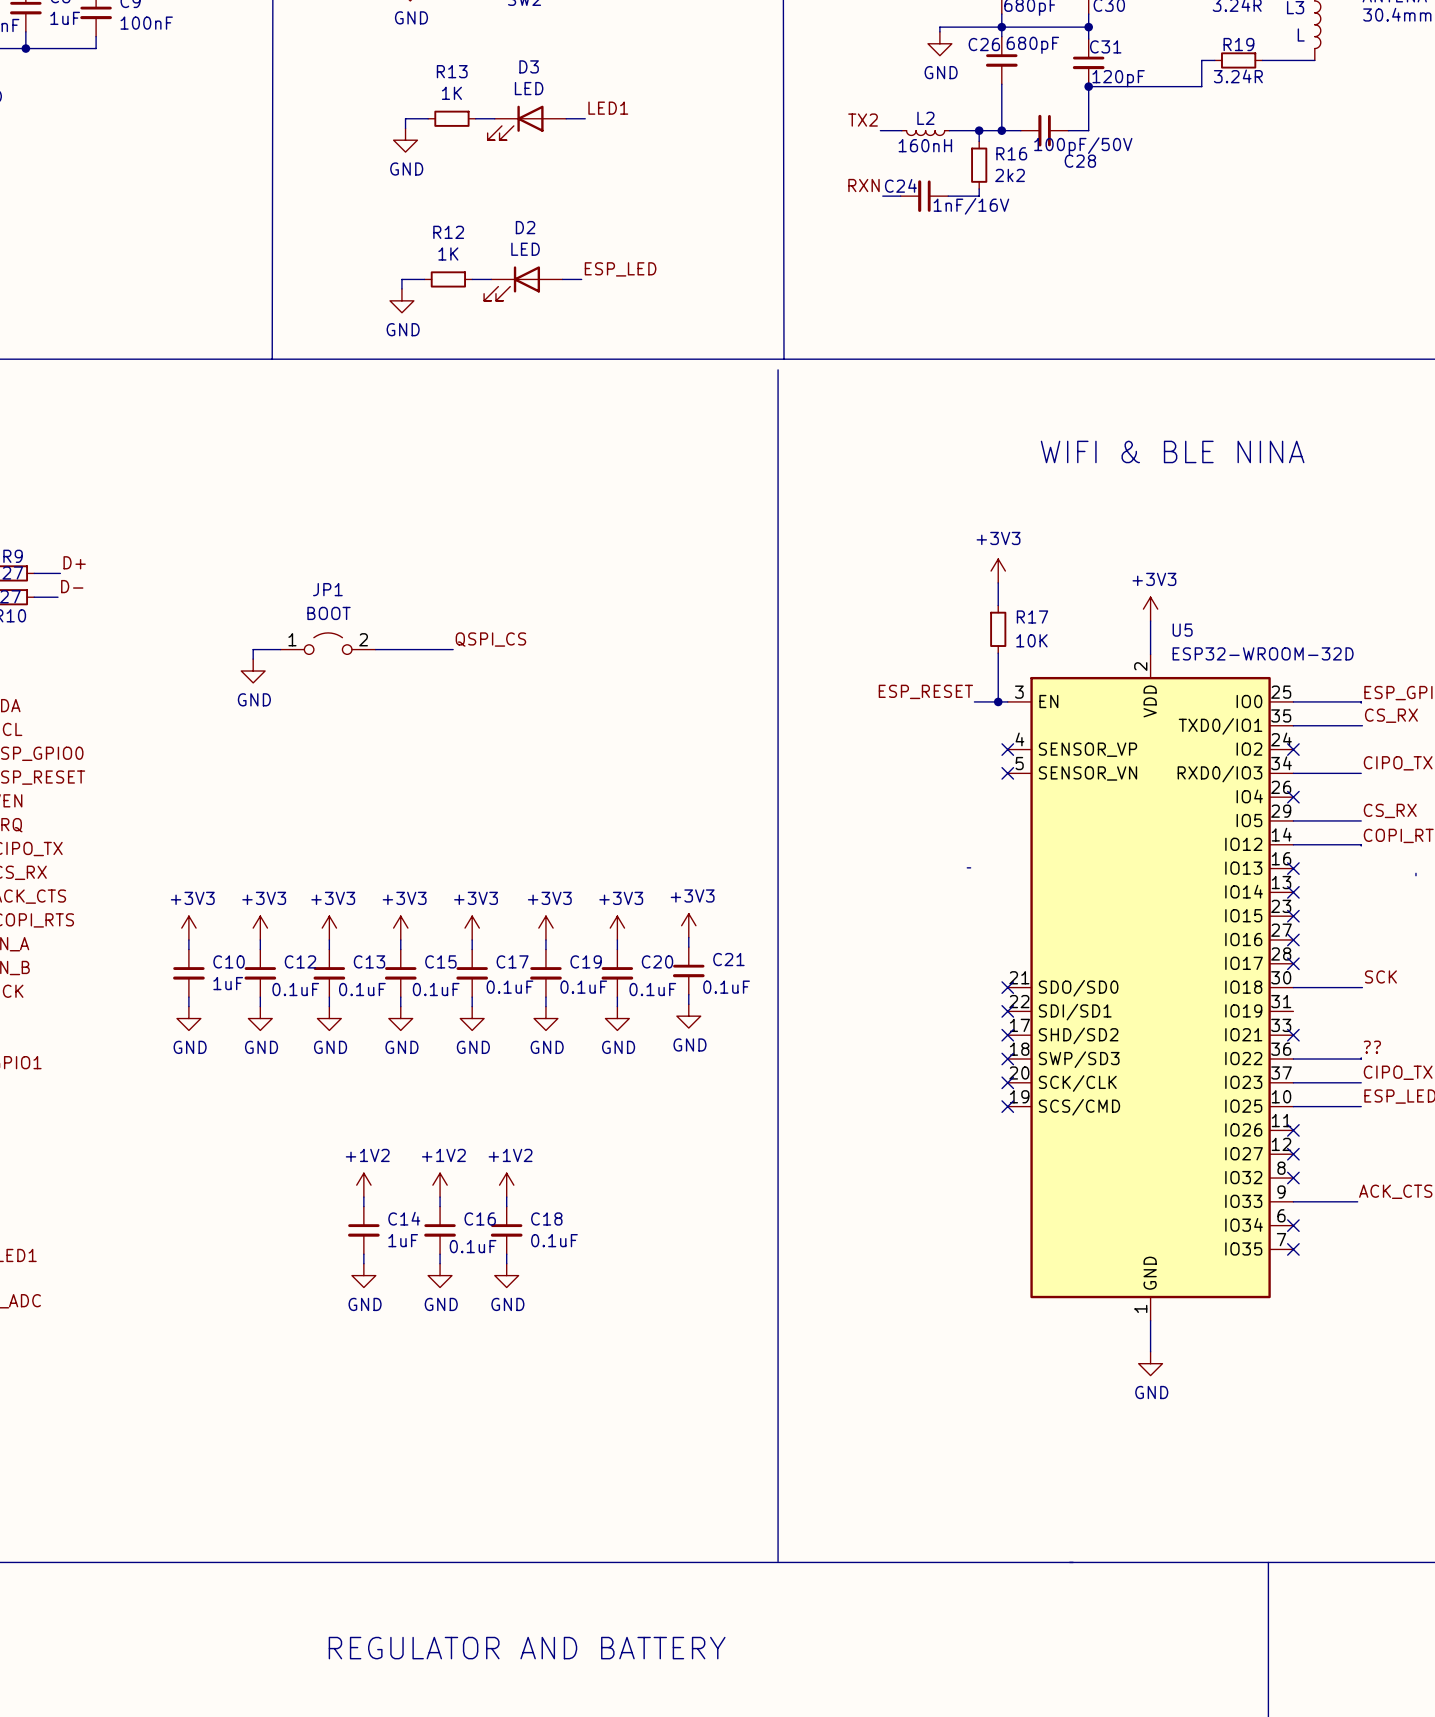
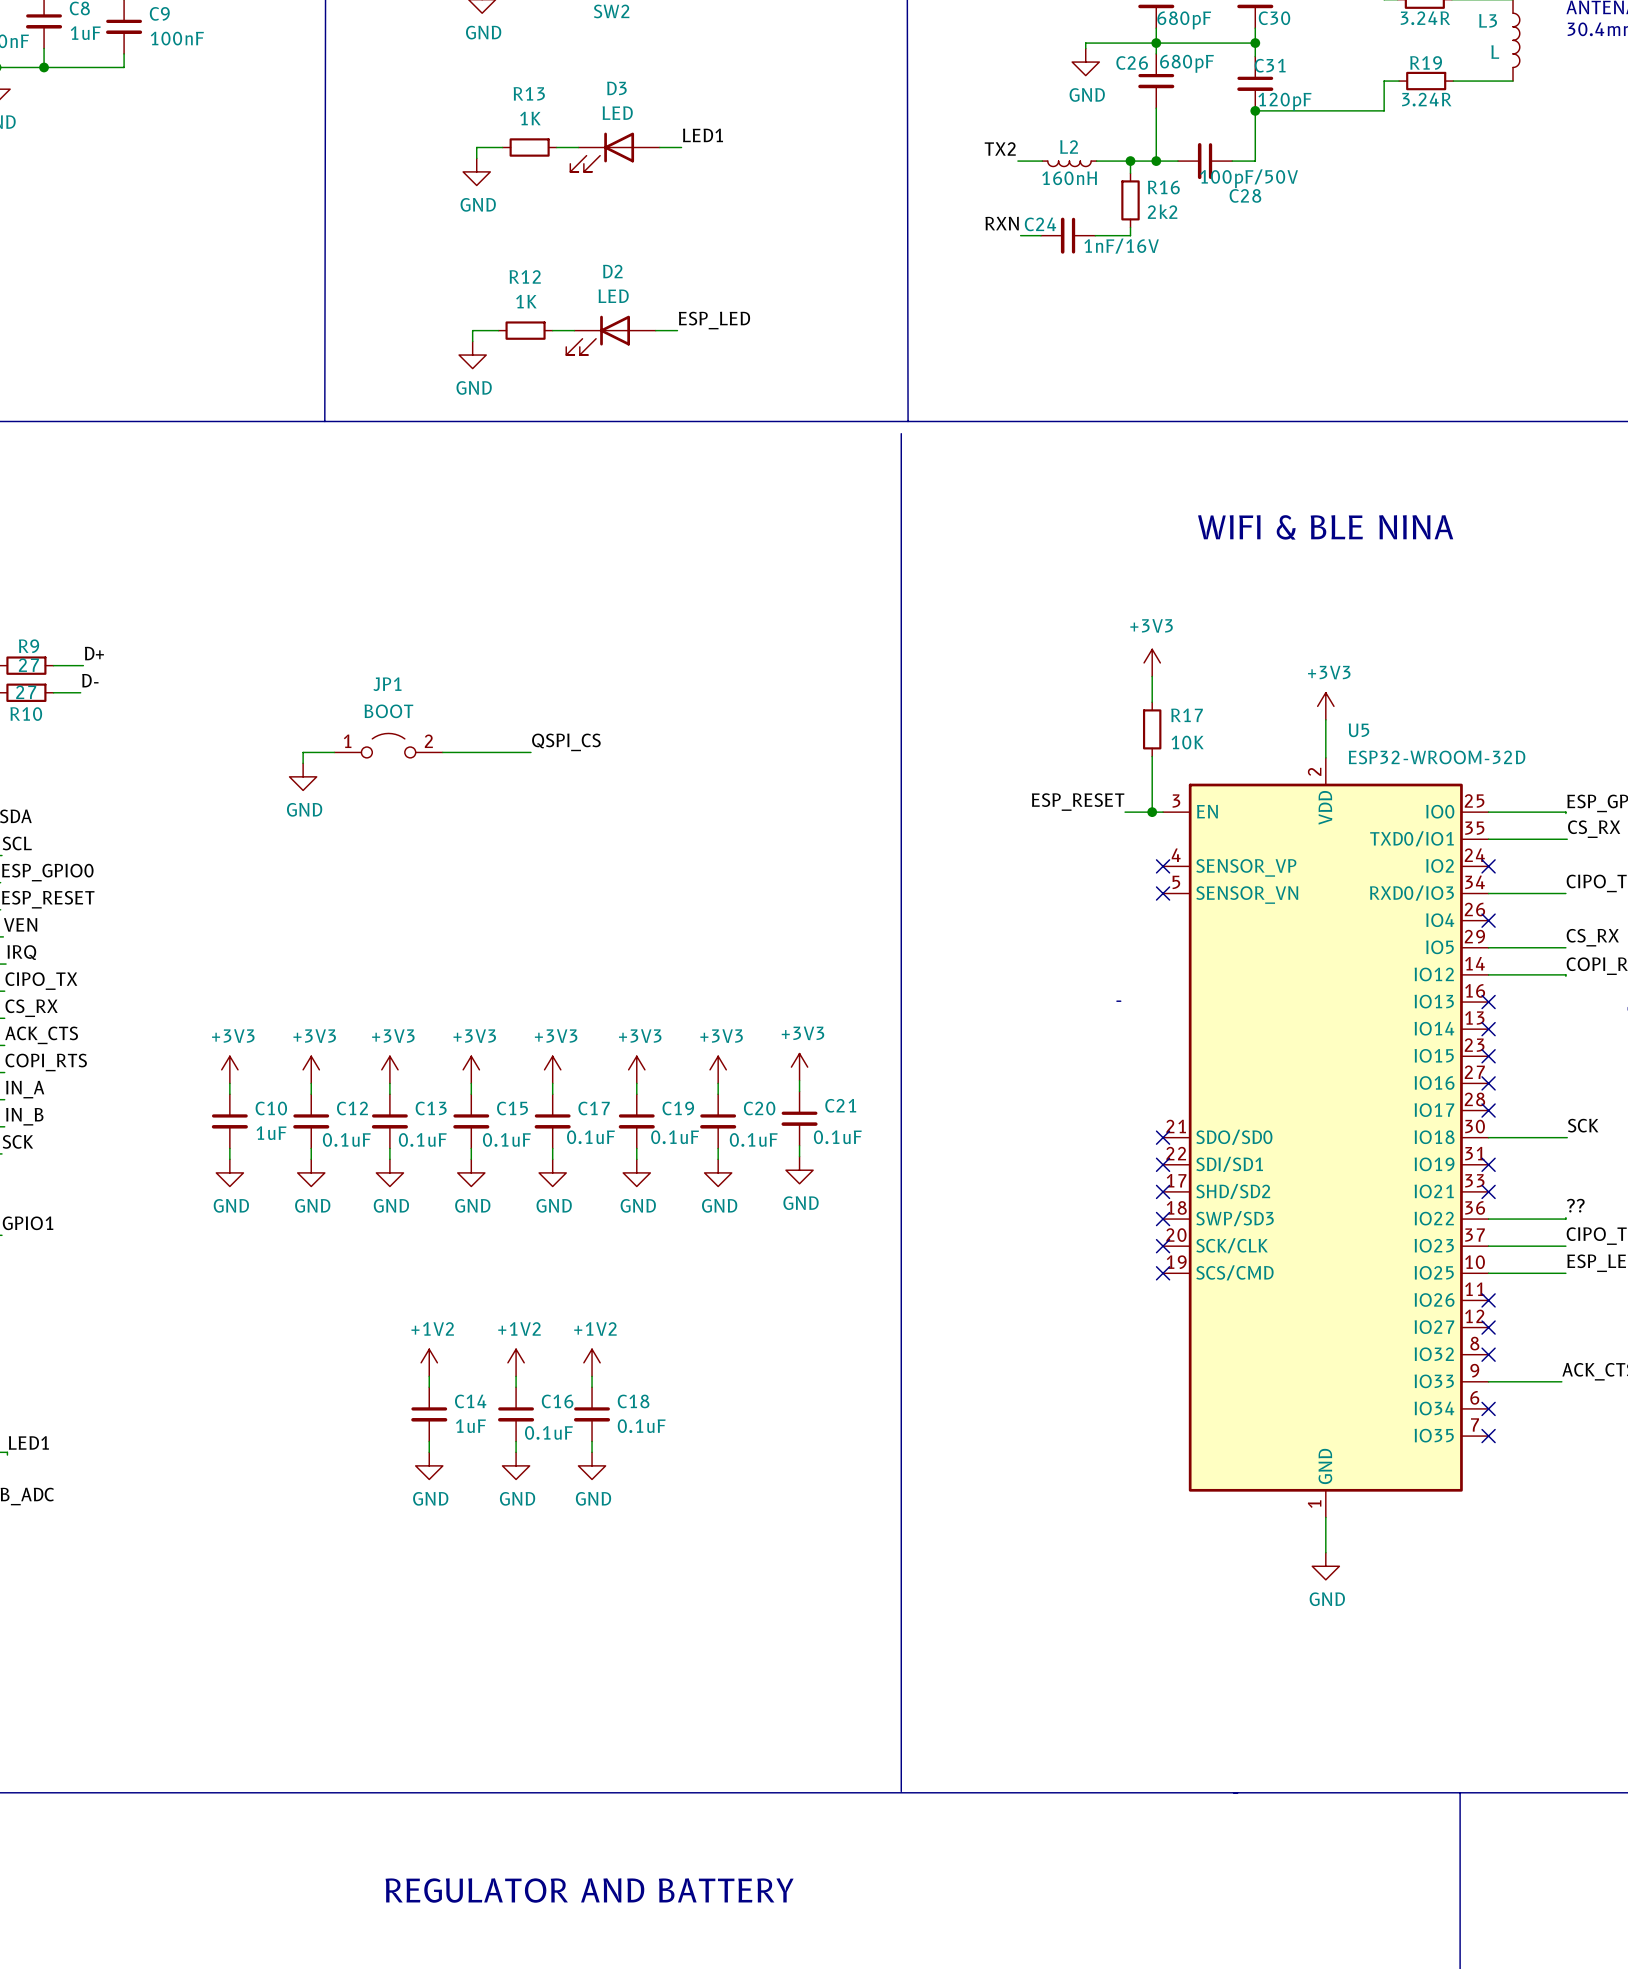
no-connect mark: none -> (1488, 1164)

